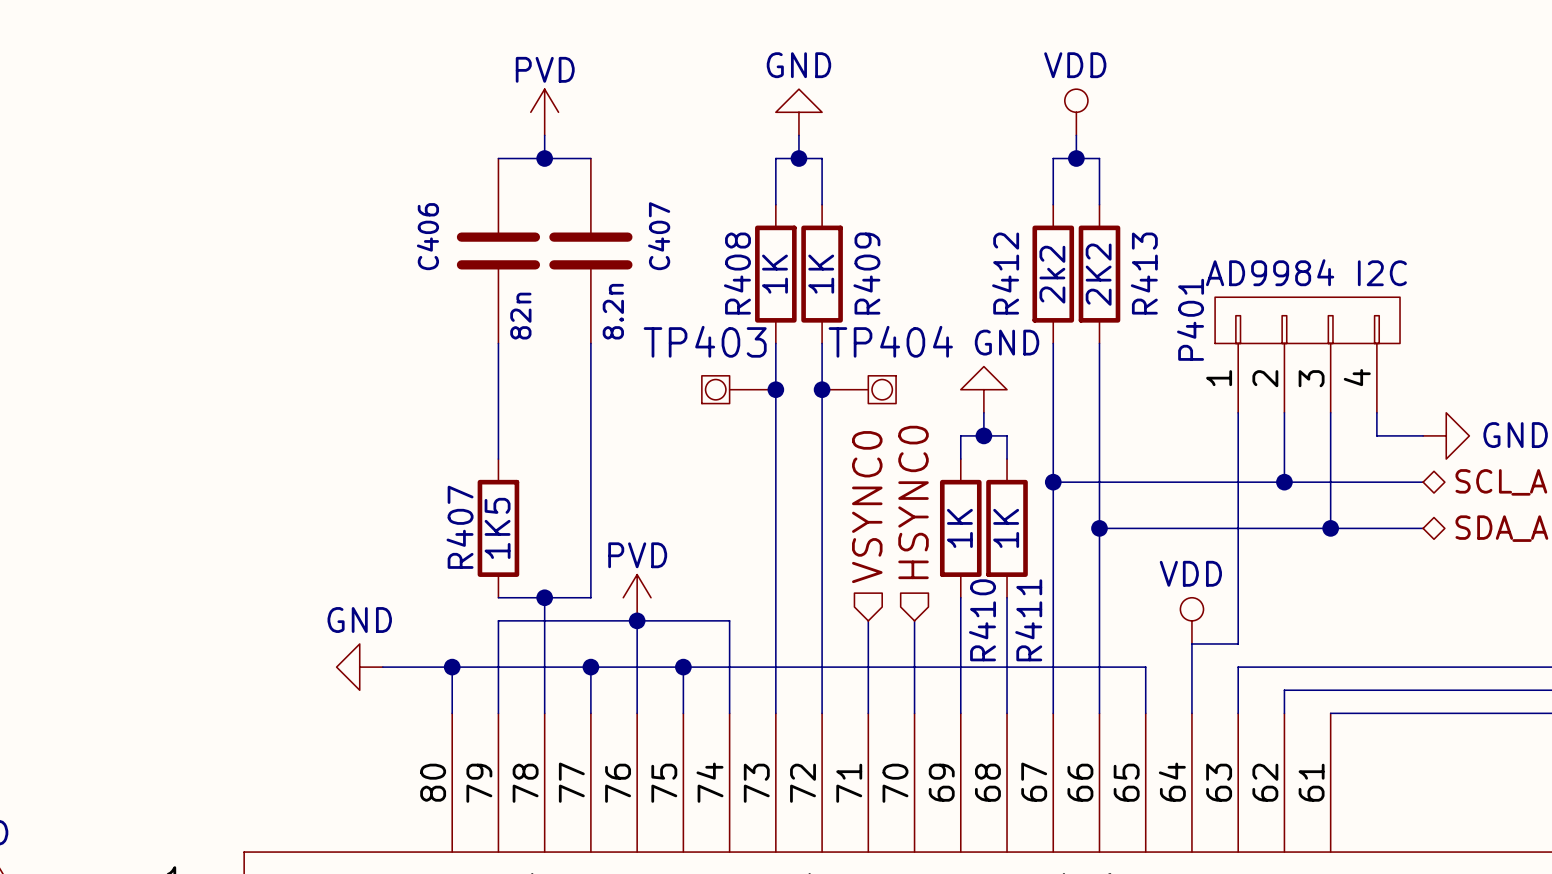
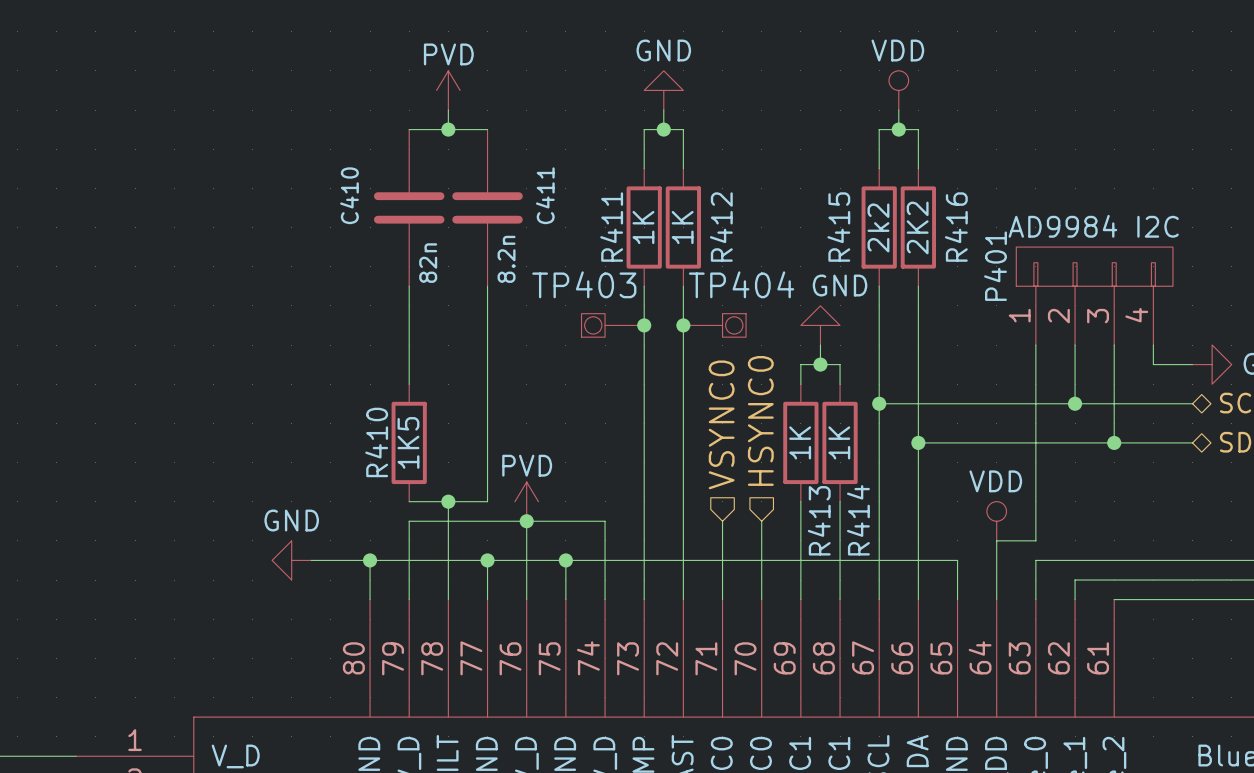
C406 name: C406 (427, 236) -> C410 (349, 195)
C407 name: C407 (659, 236) -> C411 (545, 195)
R408 name: R408 (737, 273) -> R411 (611, 227)
R409 name: R409 (866, 273) -> R412 (721, 227)
R412 name: R412 (1005, 273) -> R415 (838, 227)
R413 name: R413 (1144, 273) -> R416 (956, 227)
R407 name: R407 (460, 527) -> R410 (376, 442)
R410 name: R410 (982, 620) -> R413 (819, 520)
R411 name: R411 (1028, 620) -> R414 (858, 520)

